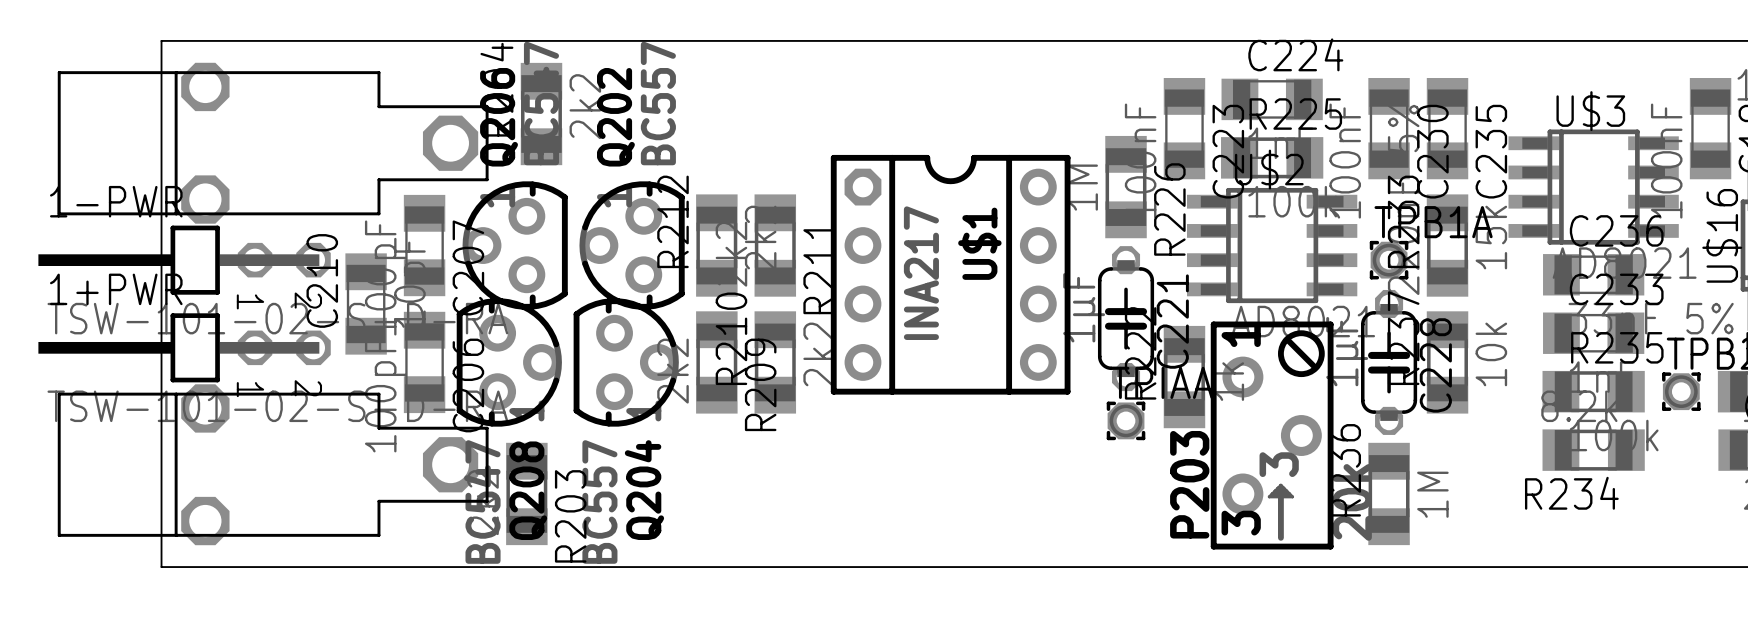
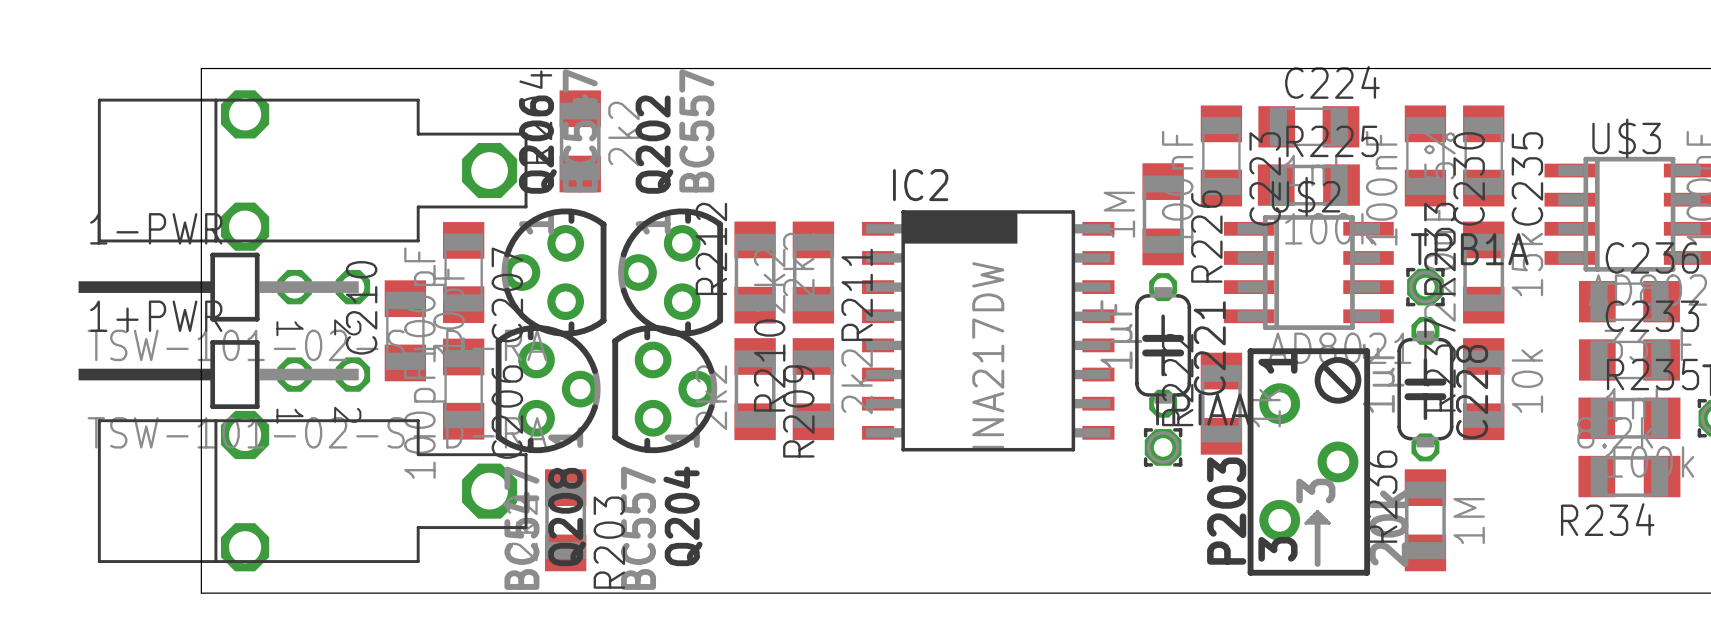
U$1: INA217 (950, 274) -> none
IC2: none -> INA217DW (988, 330)

